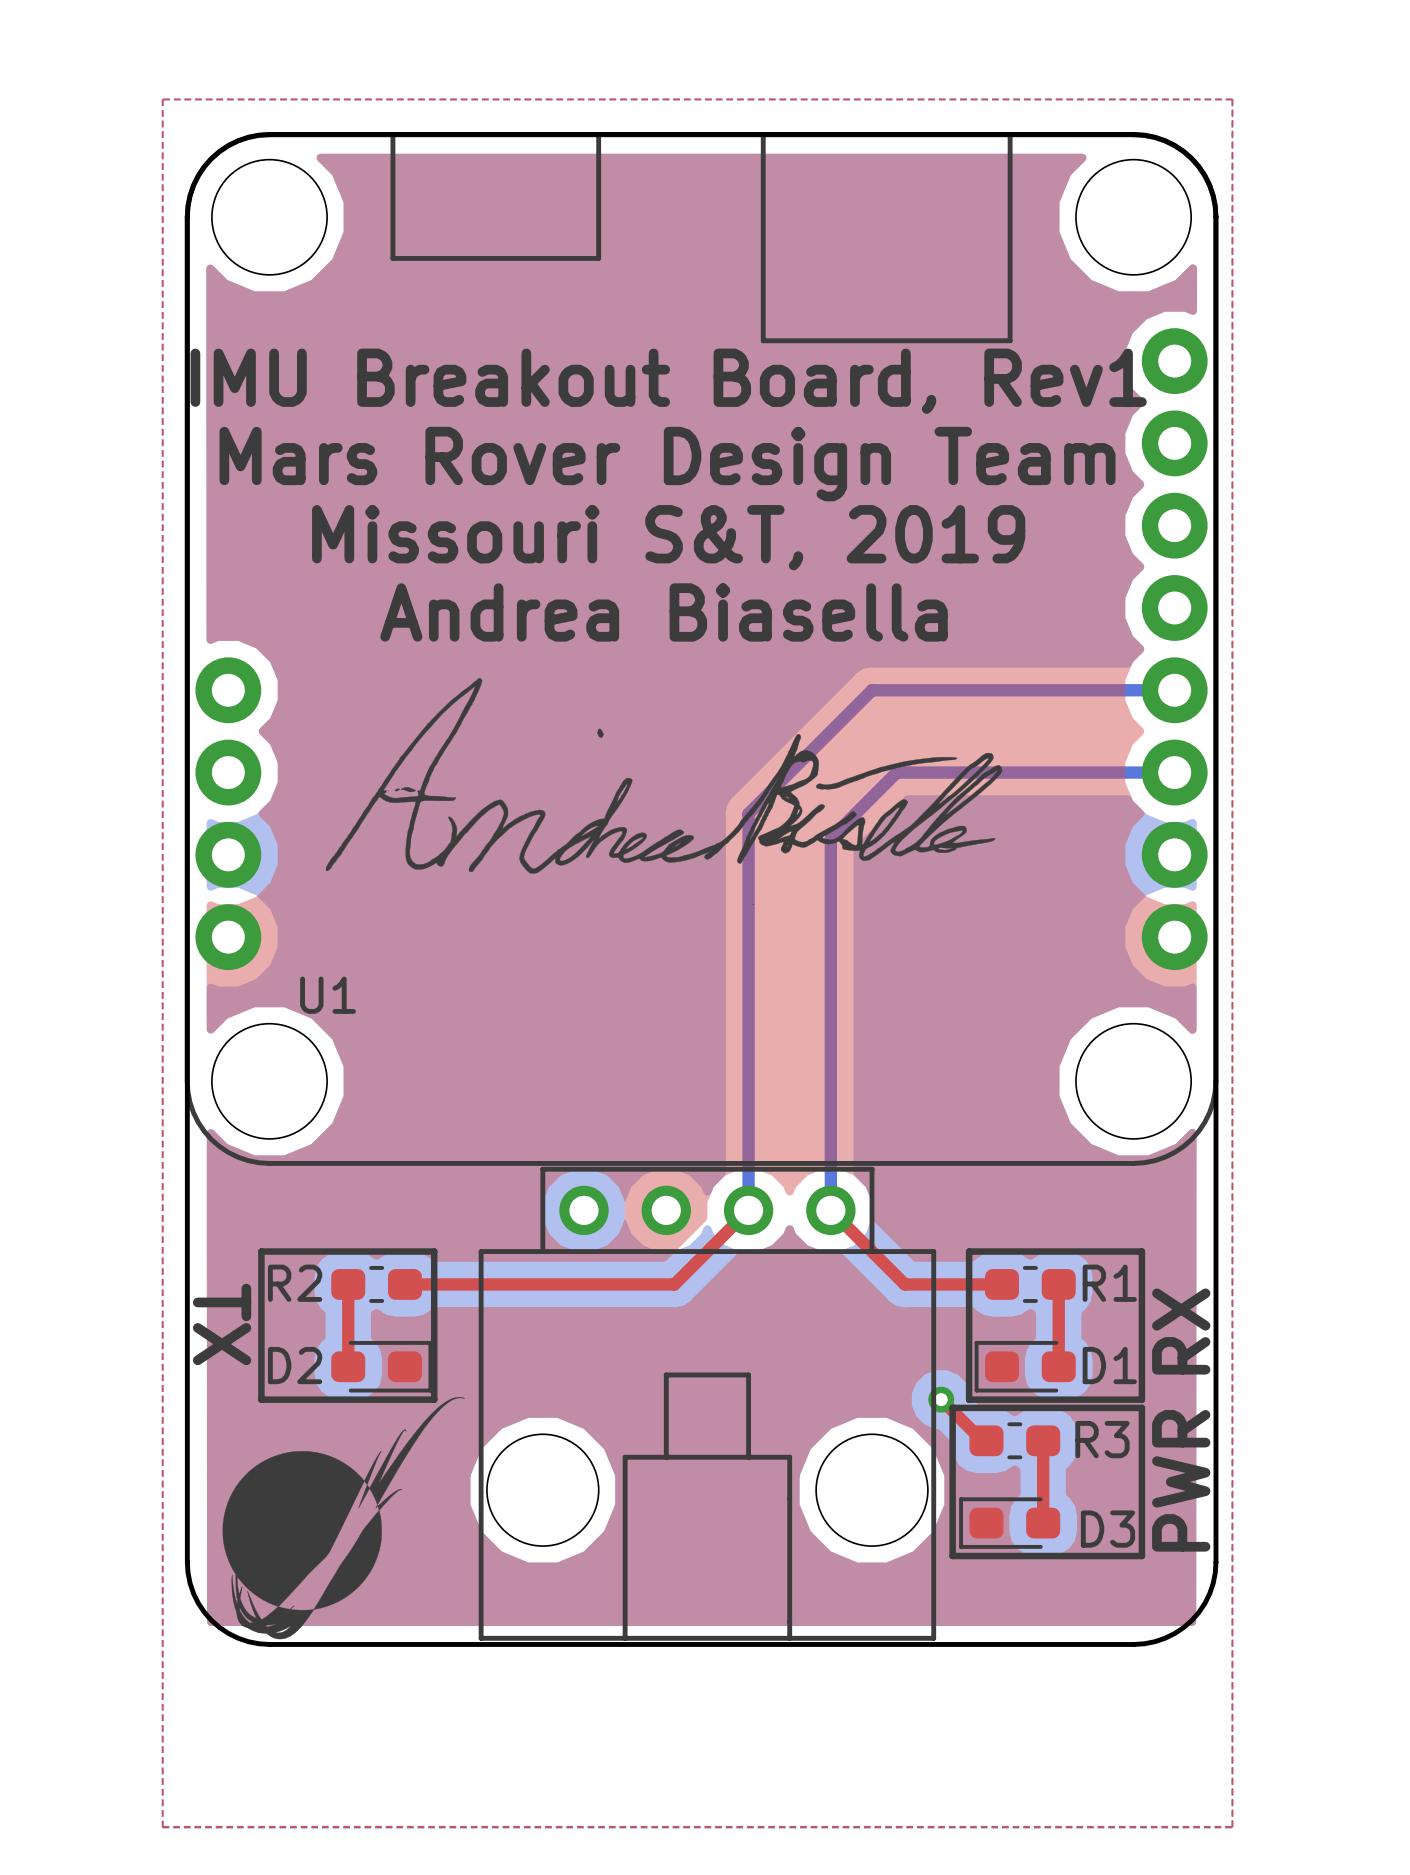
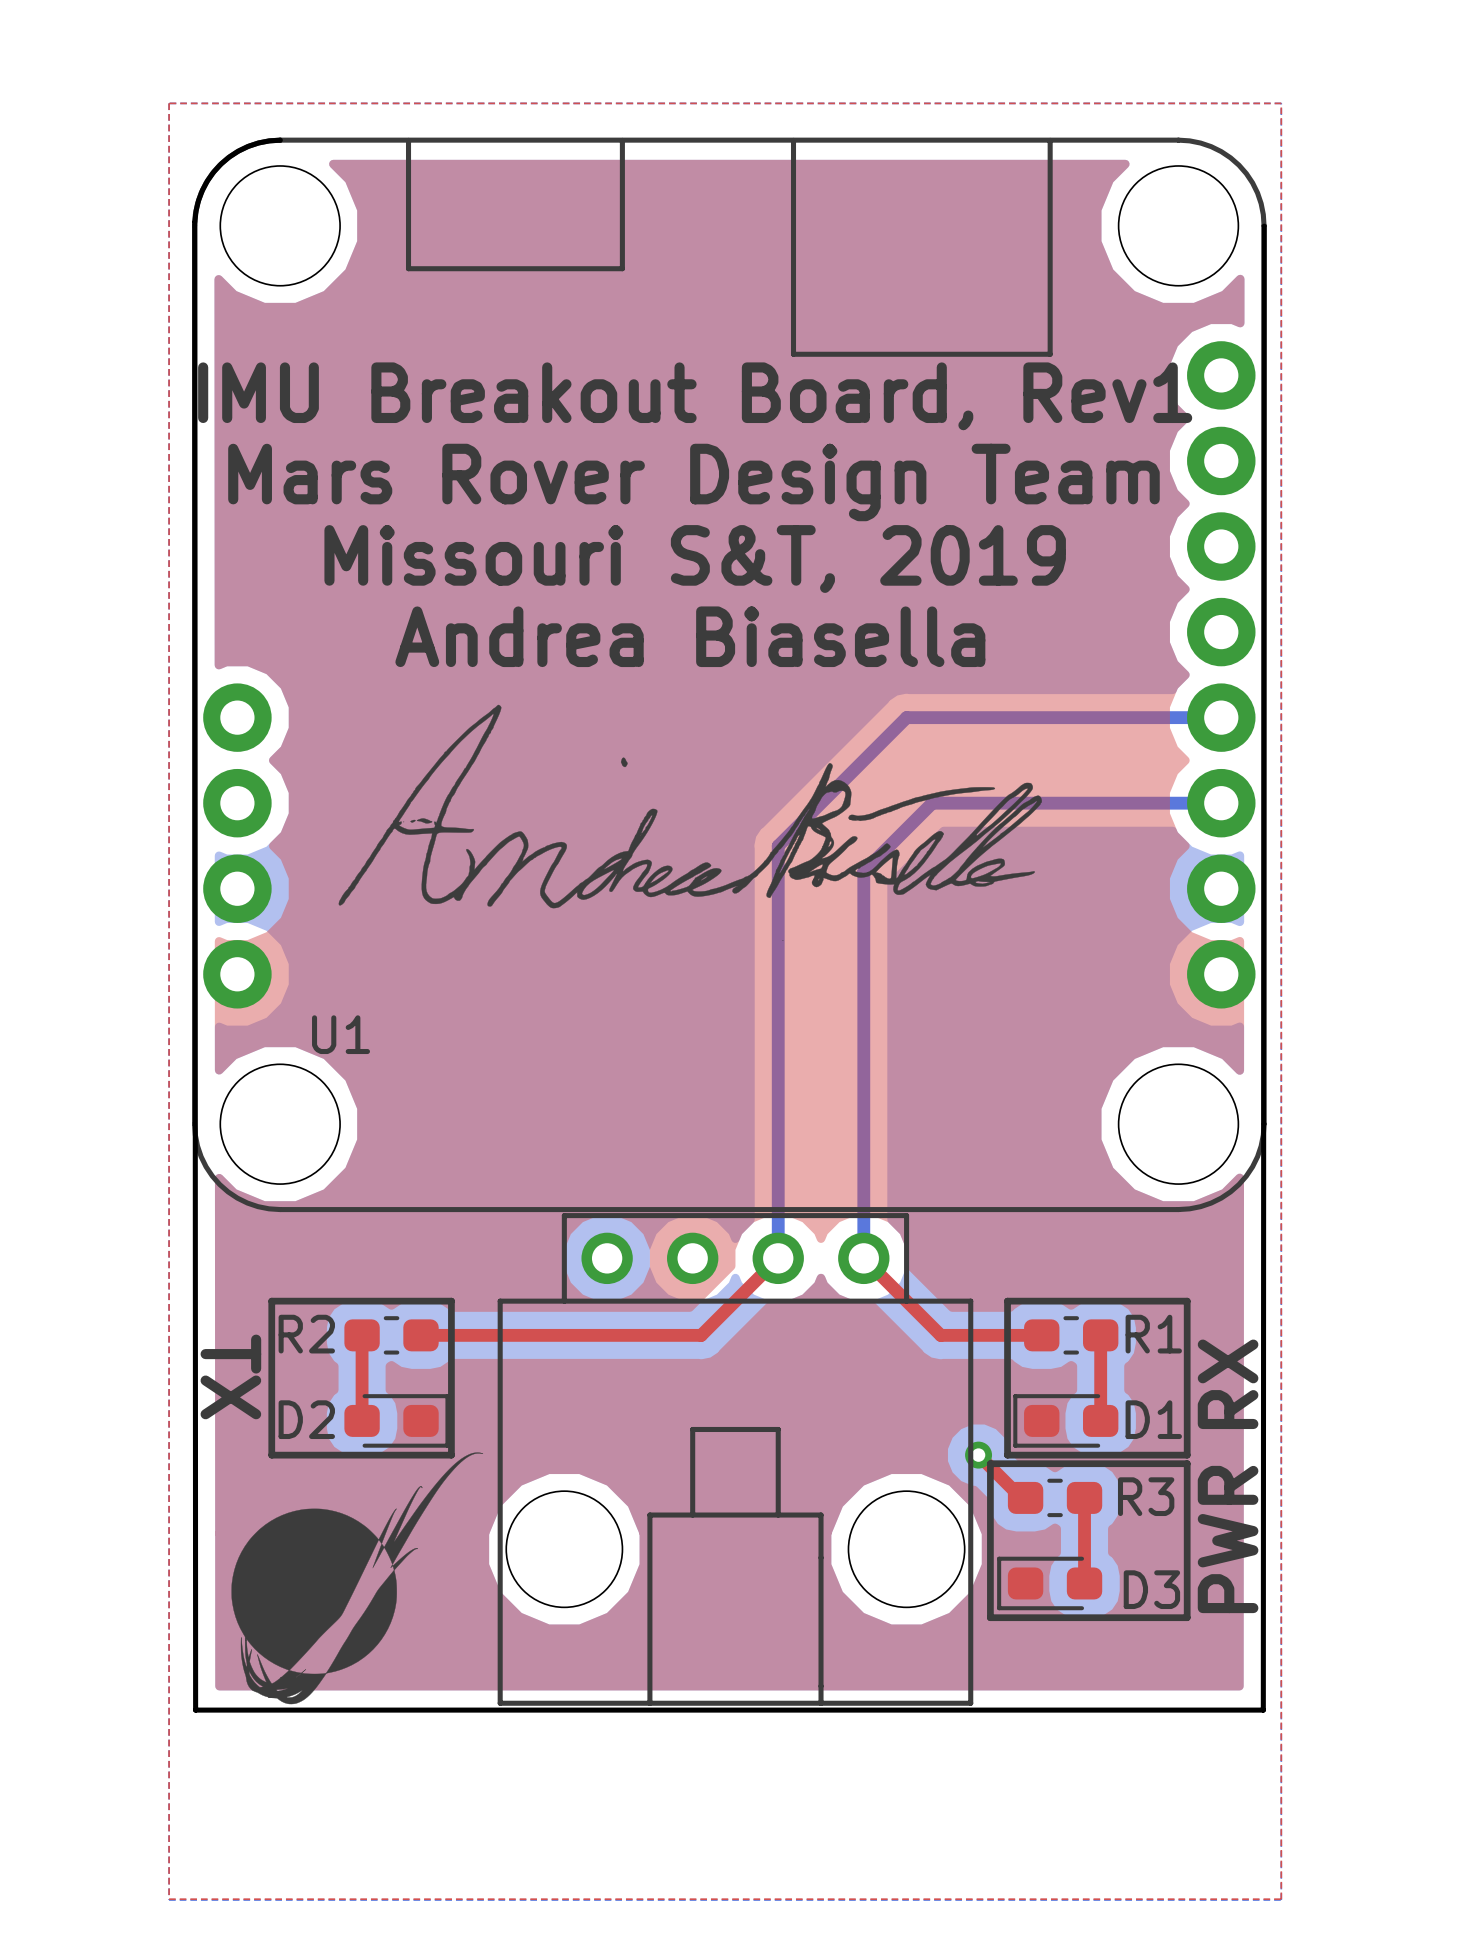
board edge: (269, 134) (1133, 134) (1154, 137) (1174, 145) (1191, 158) (1204, 175) (1213, 195) (1215, 216) (1215, 1562) (1213, 1583) (1204, 1603) (1191, 1620) (1174, 1633) (1154, 1641) (1133, 1644) (269, 1644) (248, 1641) (228, 1633) (211, 1620) (198, 1603) (190, 1583) (187, 1562) (187, 216) (193, 185) (211, 158) (238, 140) (269, 134) -> (194, 221) (202, 190) (221, 163) (248, 146) (280, 140)
board edge: none -> (194, 222) (195, 1710) (1263, 1710) (1264, 226)

